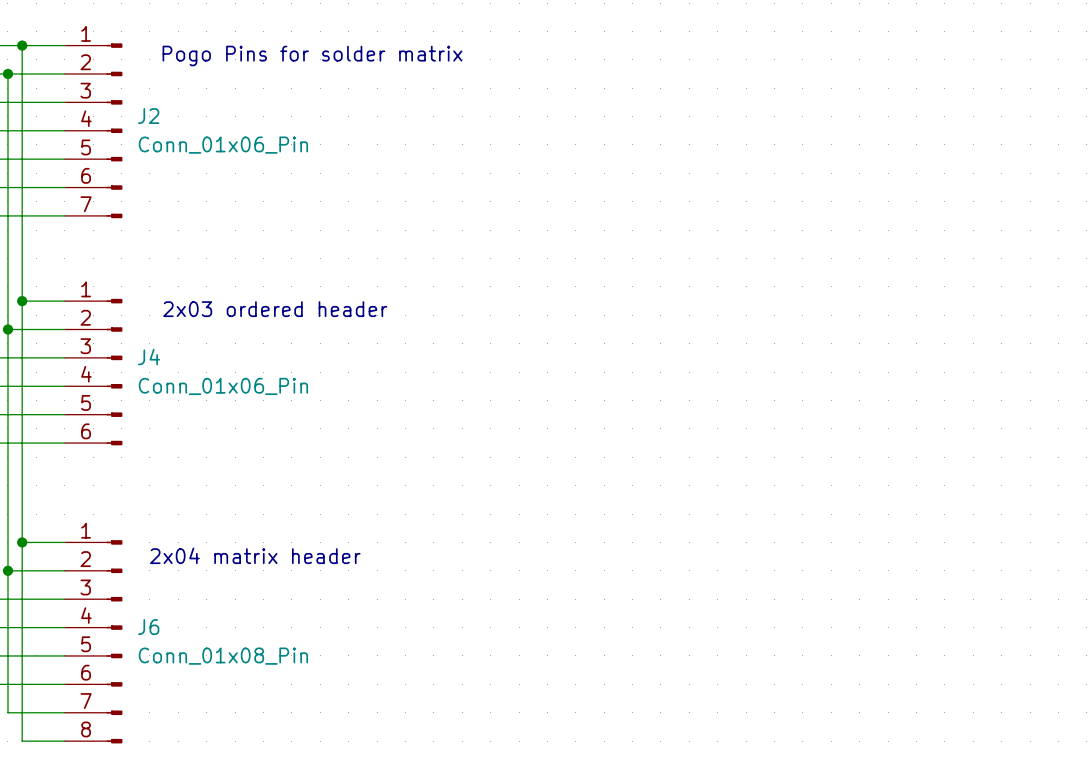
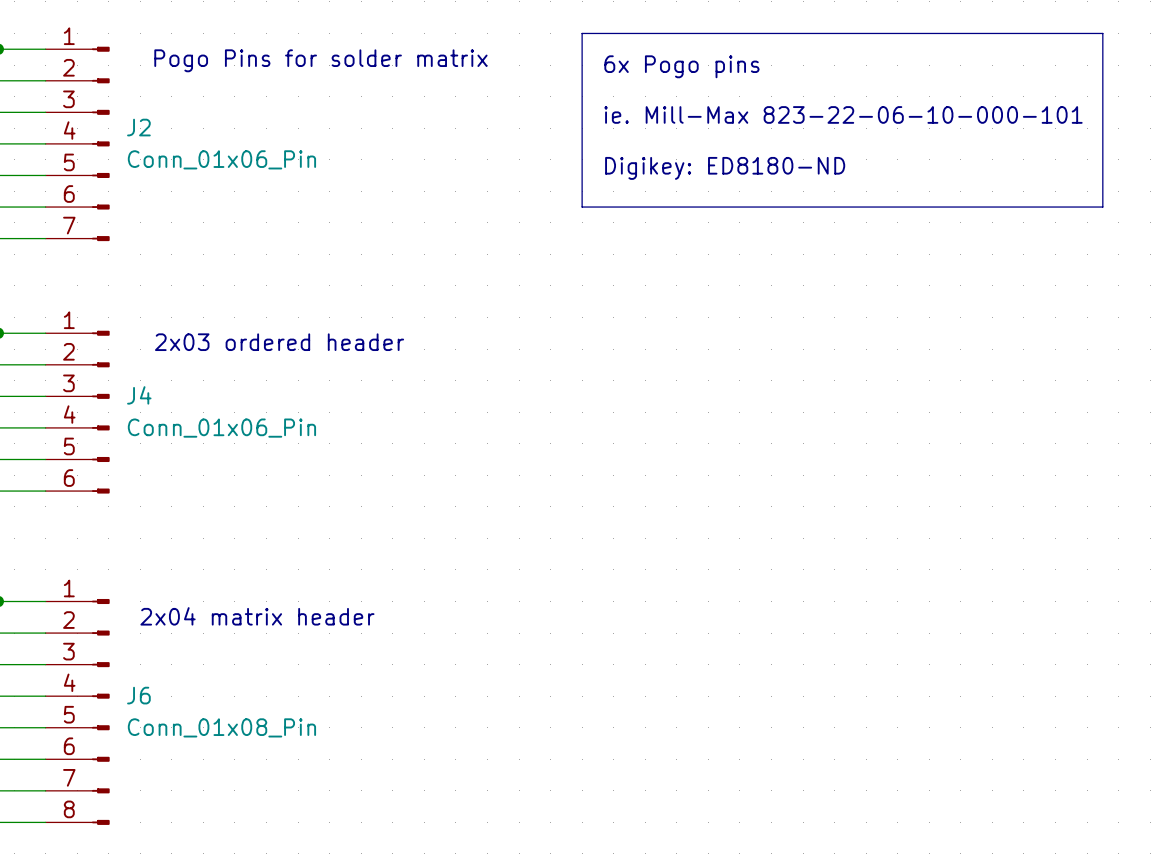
line: none -> (582, 33) (1102, 33) (1102, 207) (582, 207) (582, 33)
text: none -> 6x Pogo pins (681, 66)
text: none -> ie. Mill-Max 823-22-06-10-000-101 (843, 114)
text: none -> Digikey: ED8180-ND (725, 168)

